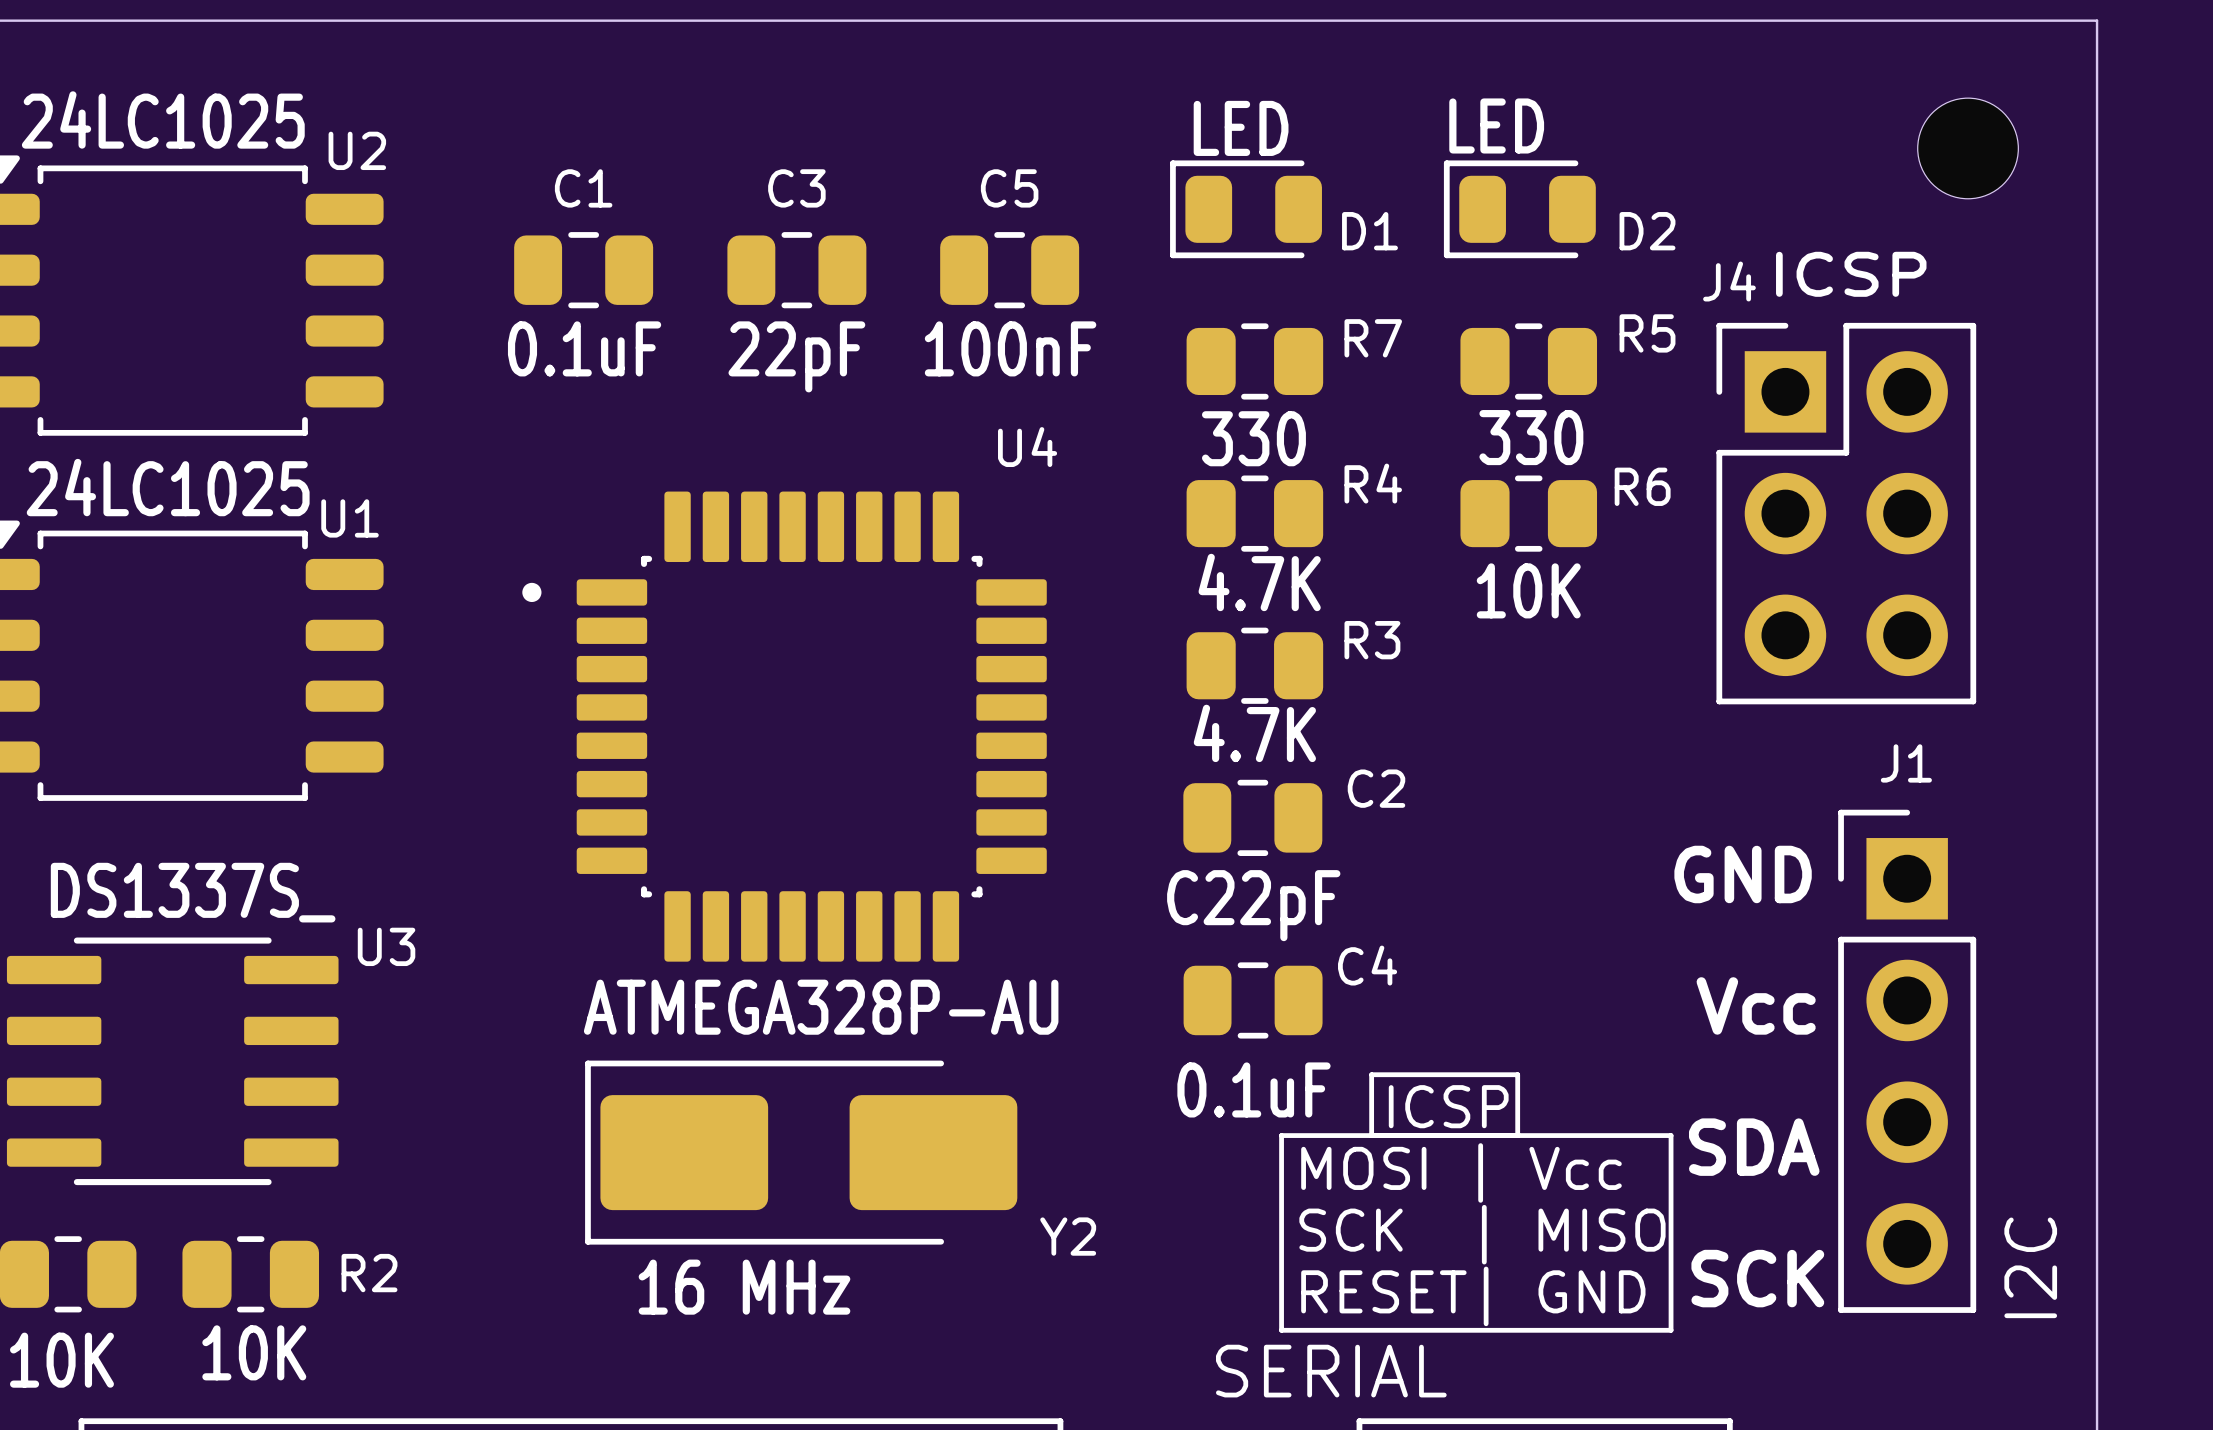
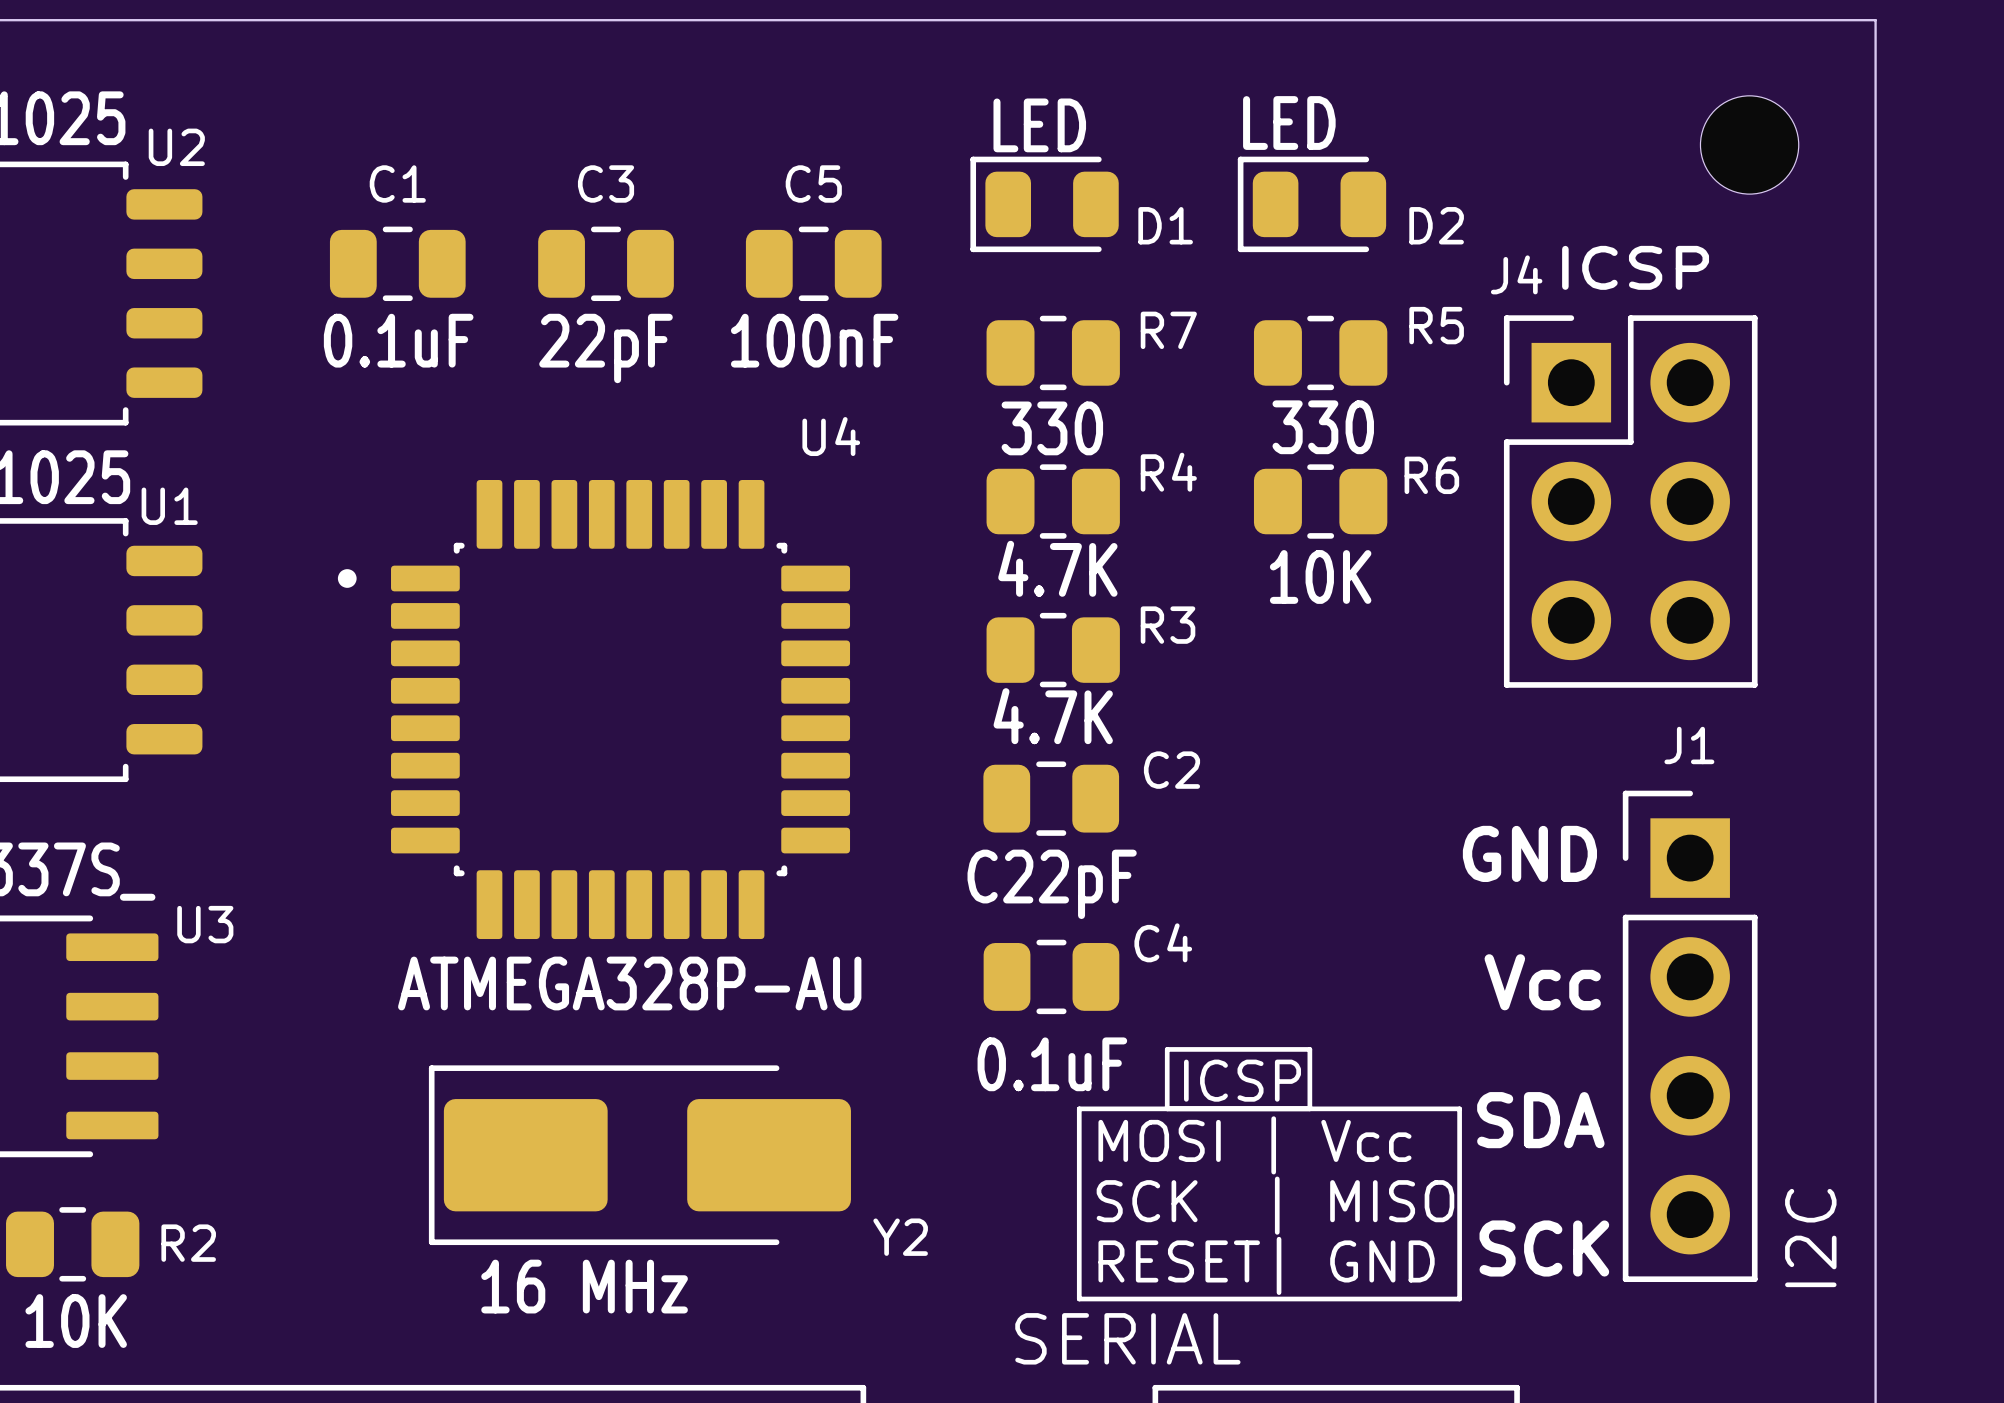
Y2 position: (801, 1152) -> (639, 1155)

